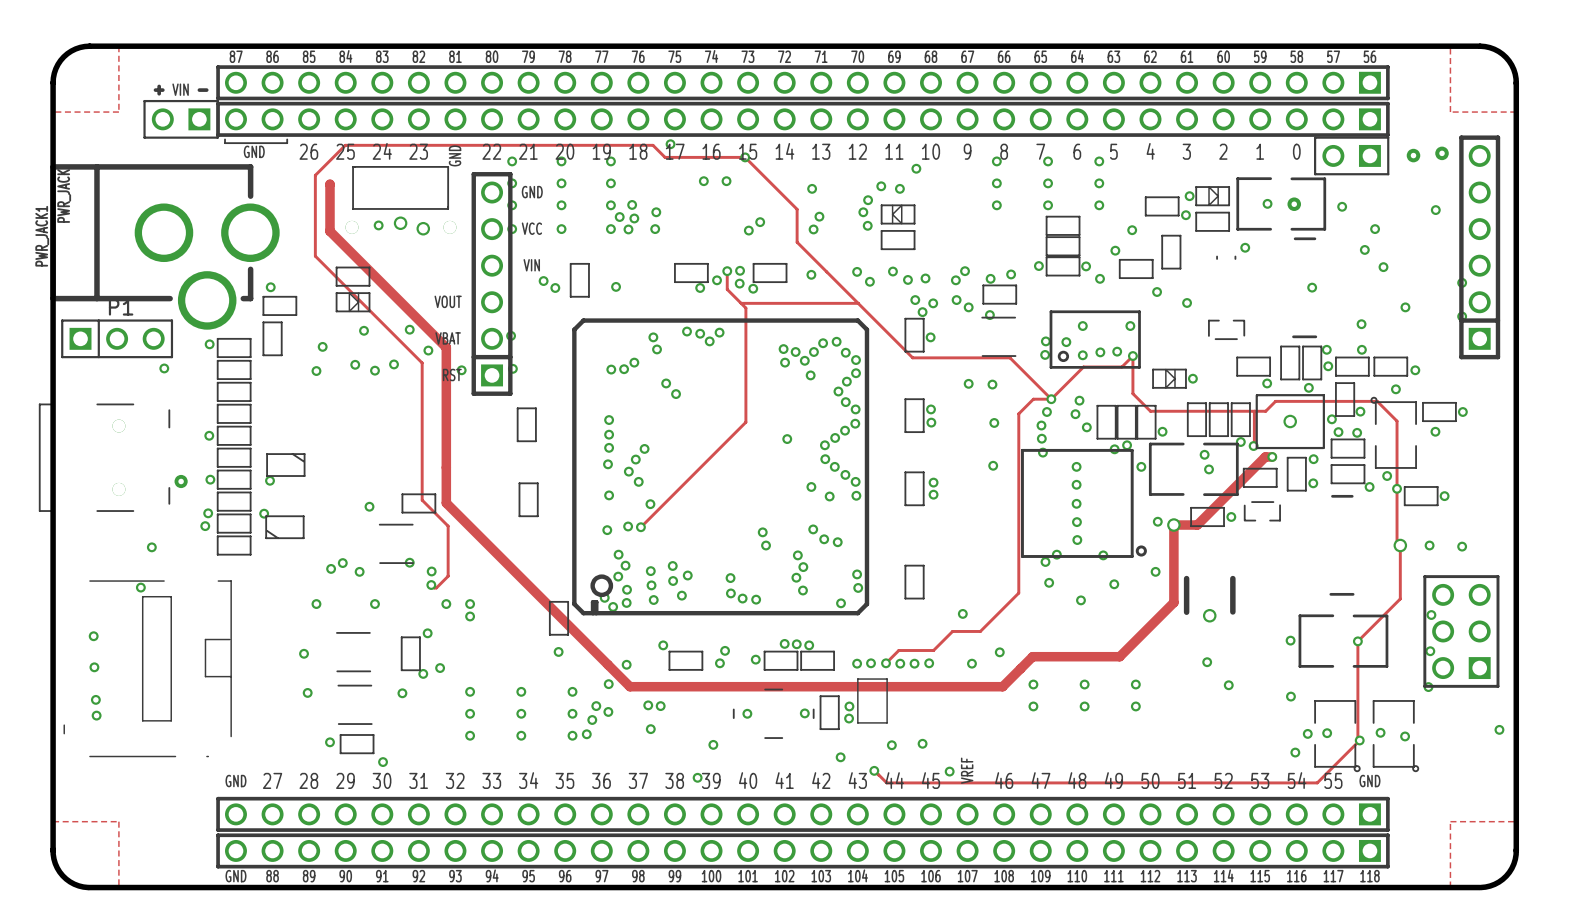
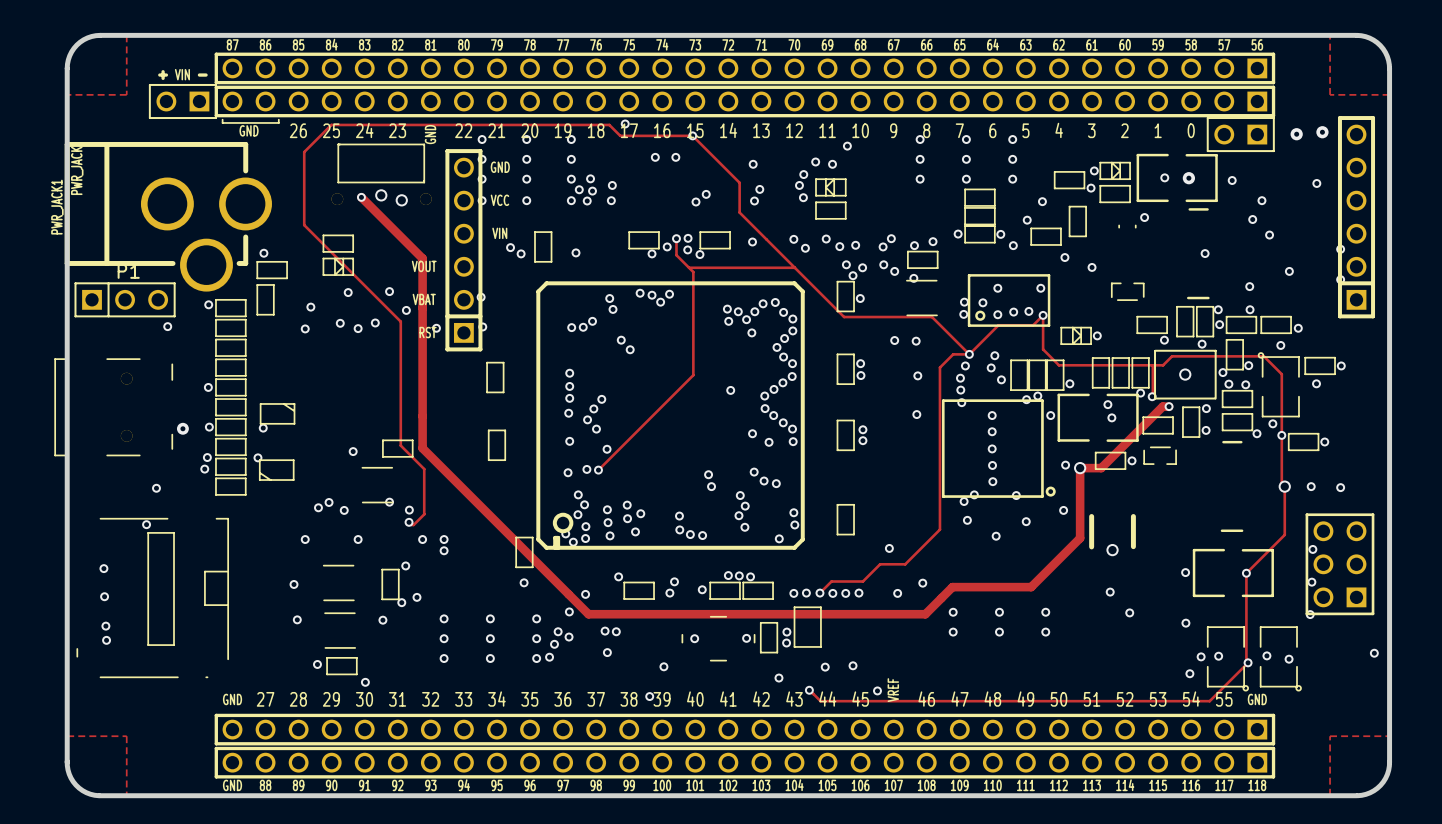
track: (329, 184) (329, 231) (446, 347) -> (361, 197) (422, 258) (422, 307)

